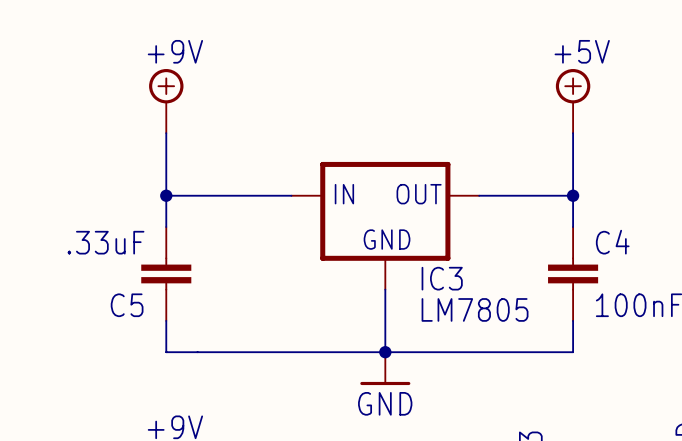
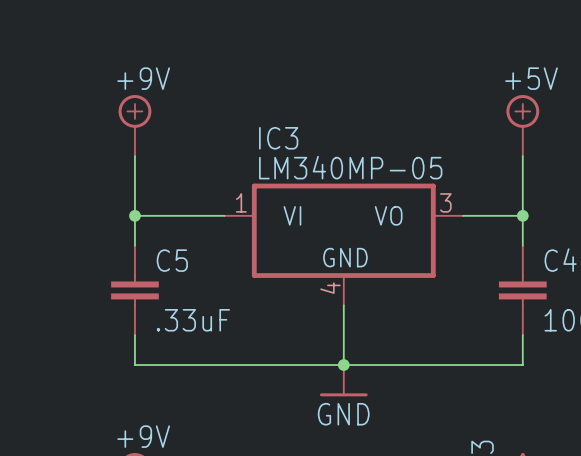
IC3 symbol: [291, 161, 480, 290] -> [224, 183, 464, 306]
C5 value position: .33uF (105, 242) -> .33uF (193, 320)
IC3 name position: IC3 (442, 278) -> IC3 (278, 138)
C5 name position: C5 (127, 305) -> C5 (172, 260)
IC3 value: LM7805 (475, 309) -> LM340MP-05 (350, 167)

